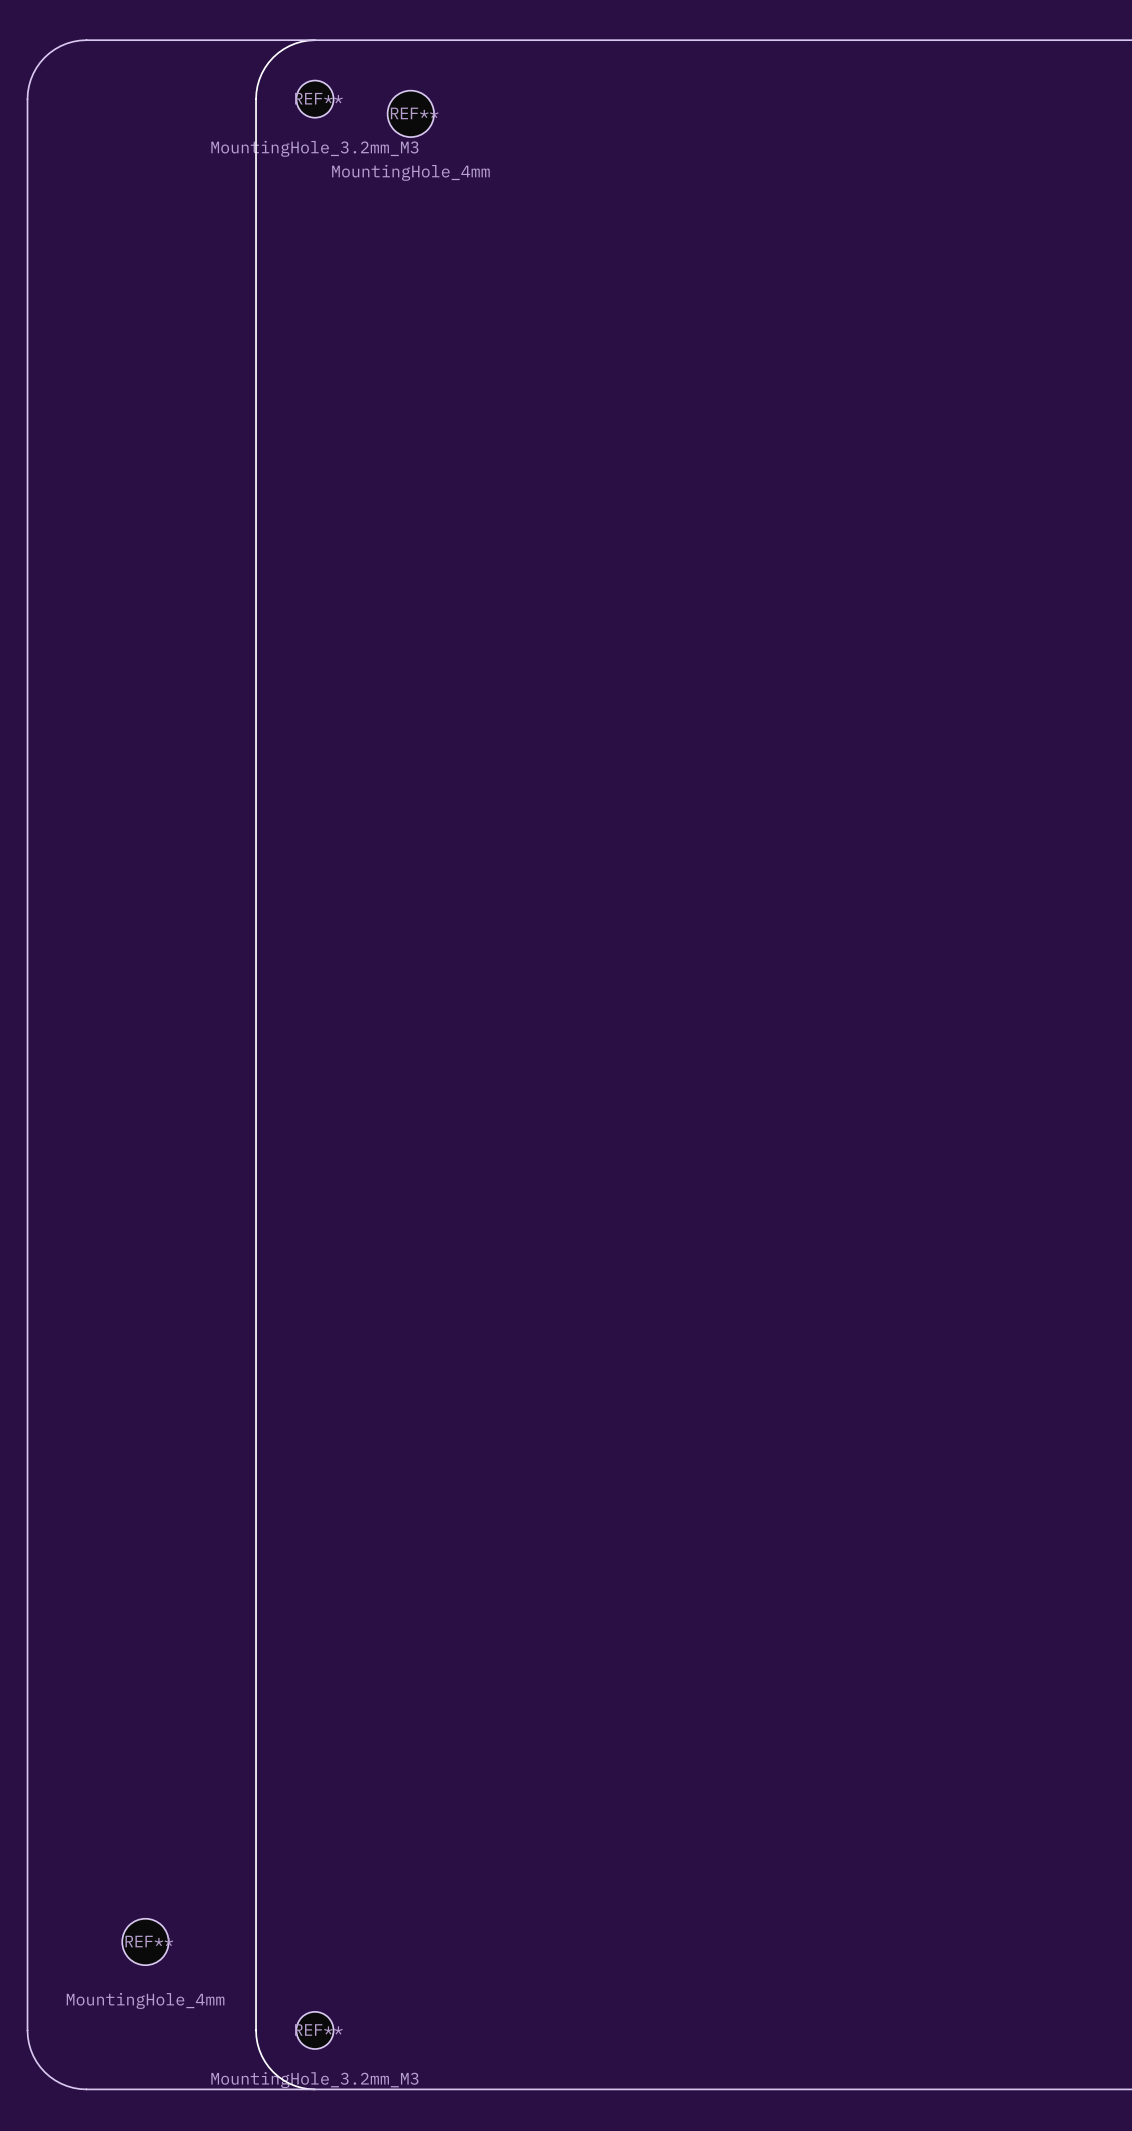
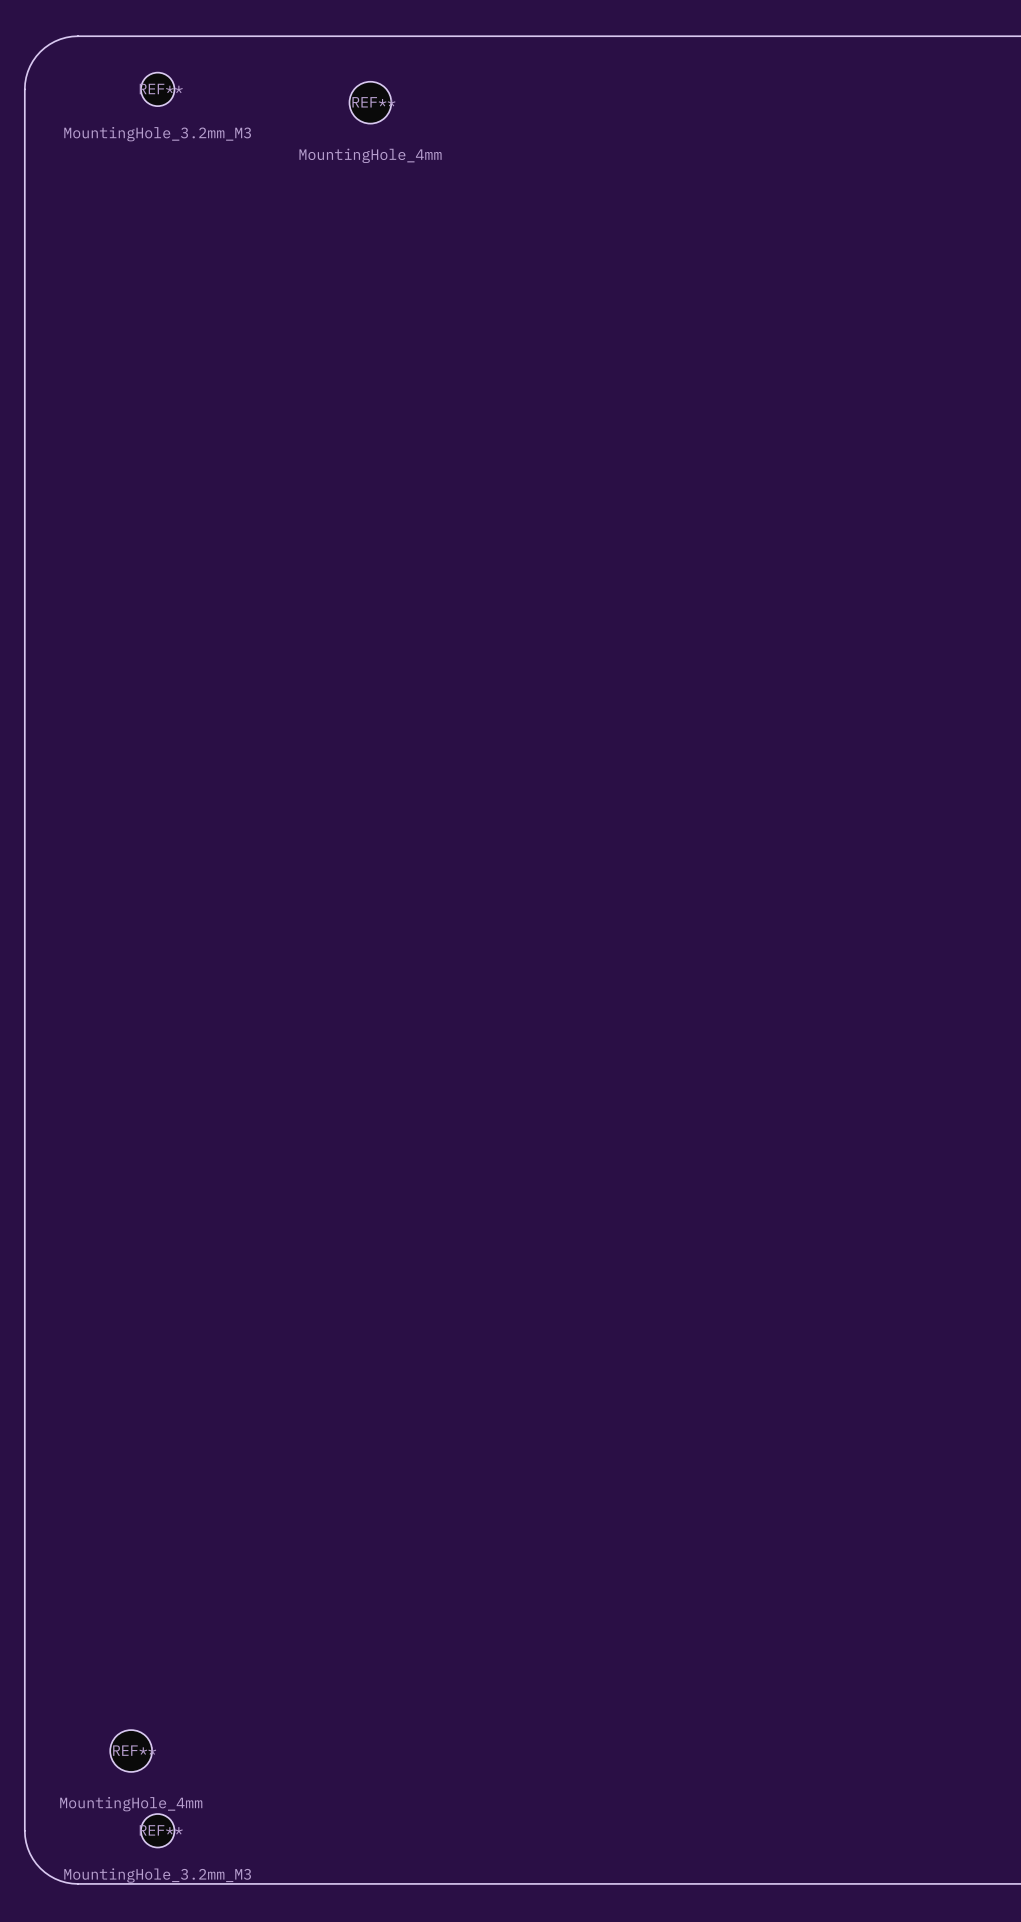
line: (314, 40) (289, 46) (273, 57) (261, 73) (256, 99) (256, 2030) (261, 2056) (273, 2072) (295, 2086) (314, 2089) -> none
REF** position: (314, 99) -> (157, 89)
REF** position: (314, 2030) -> (157, 1830)

